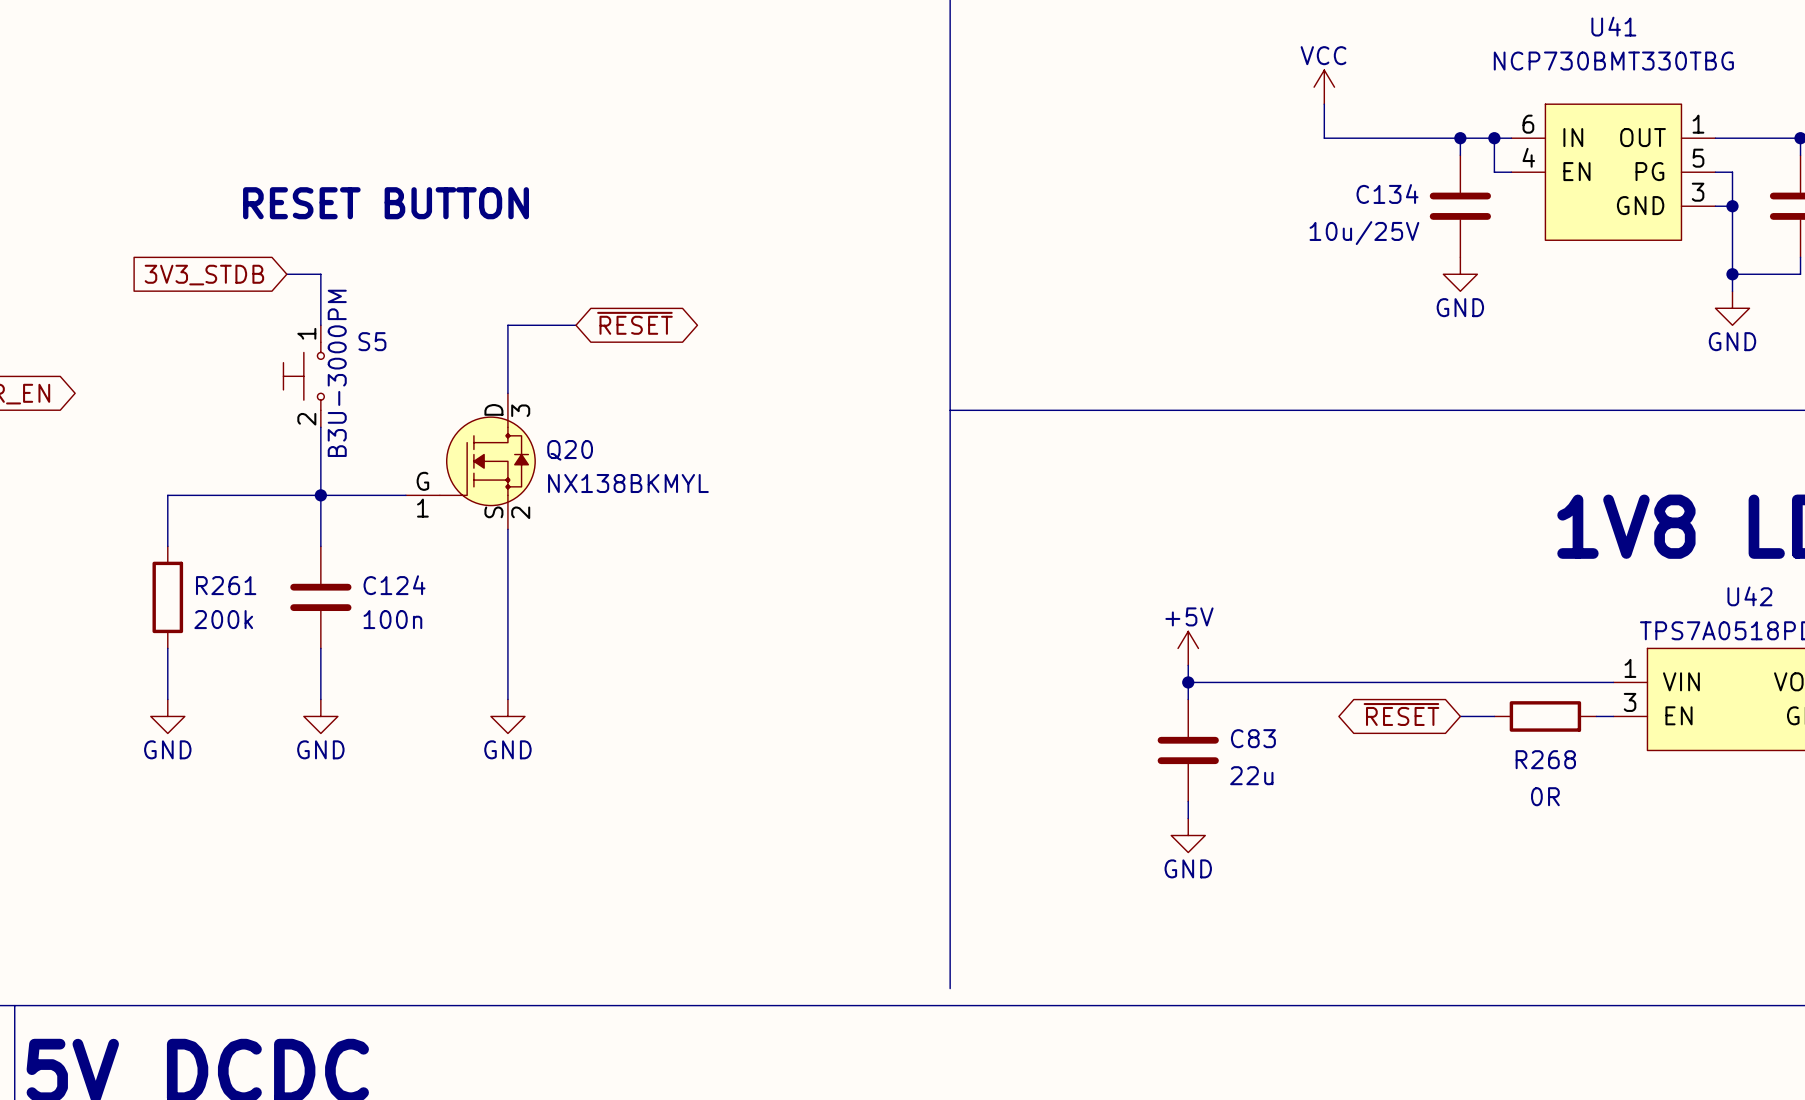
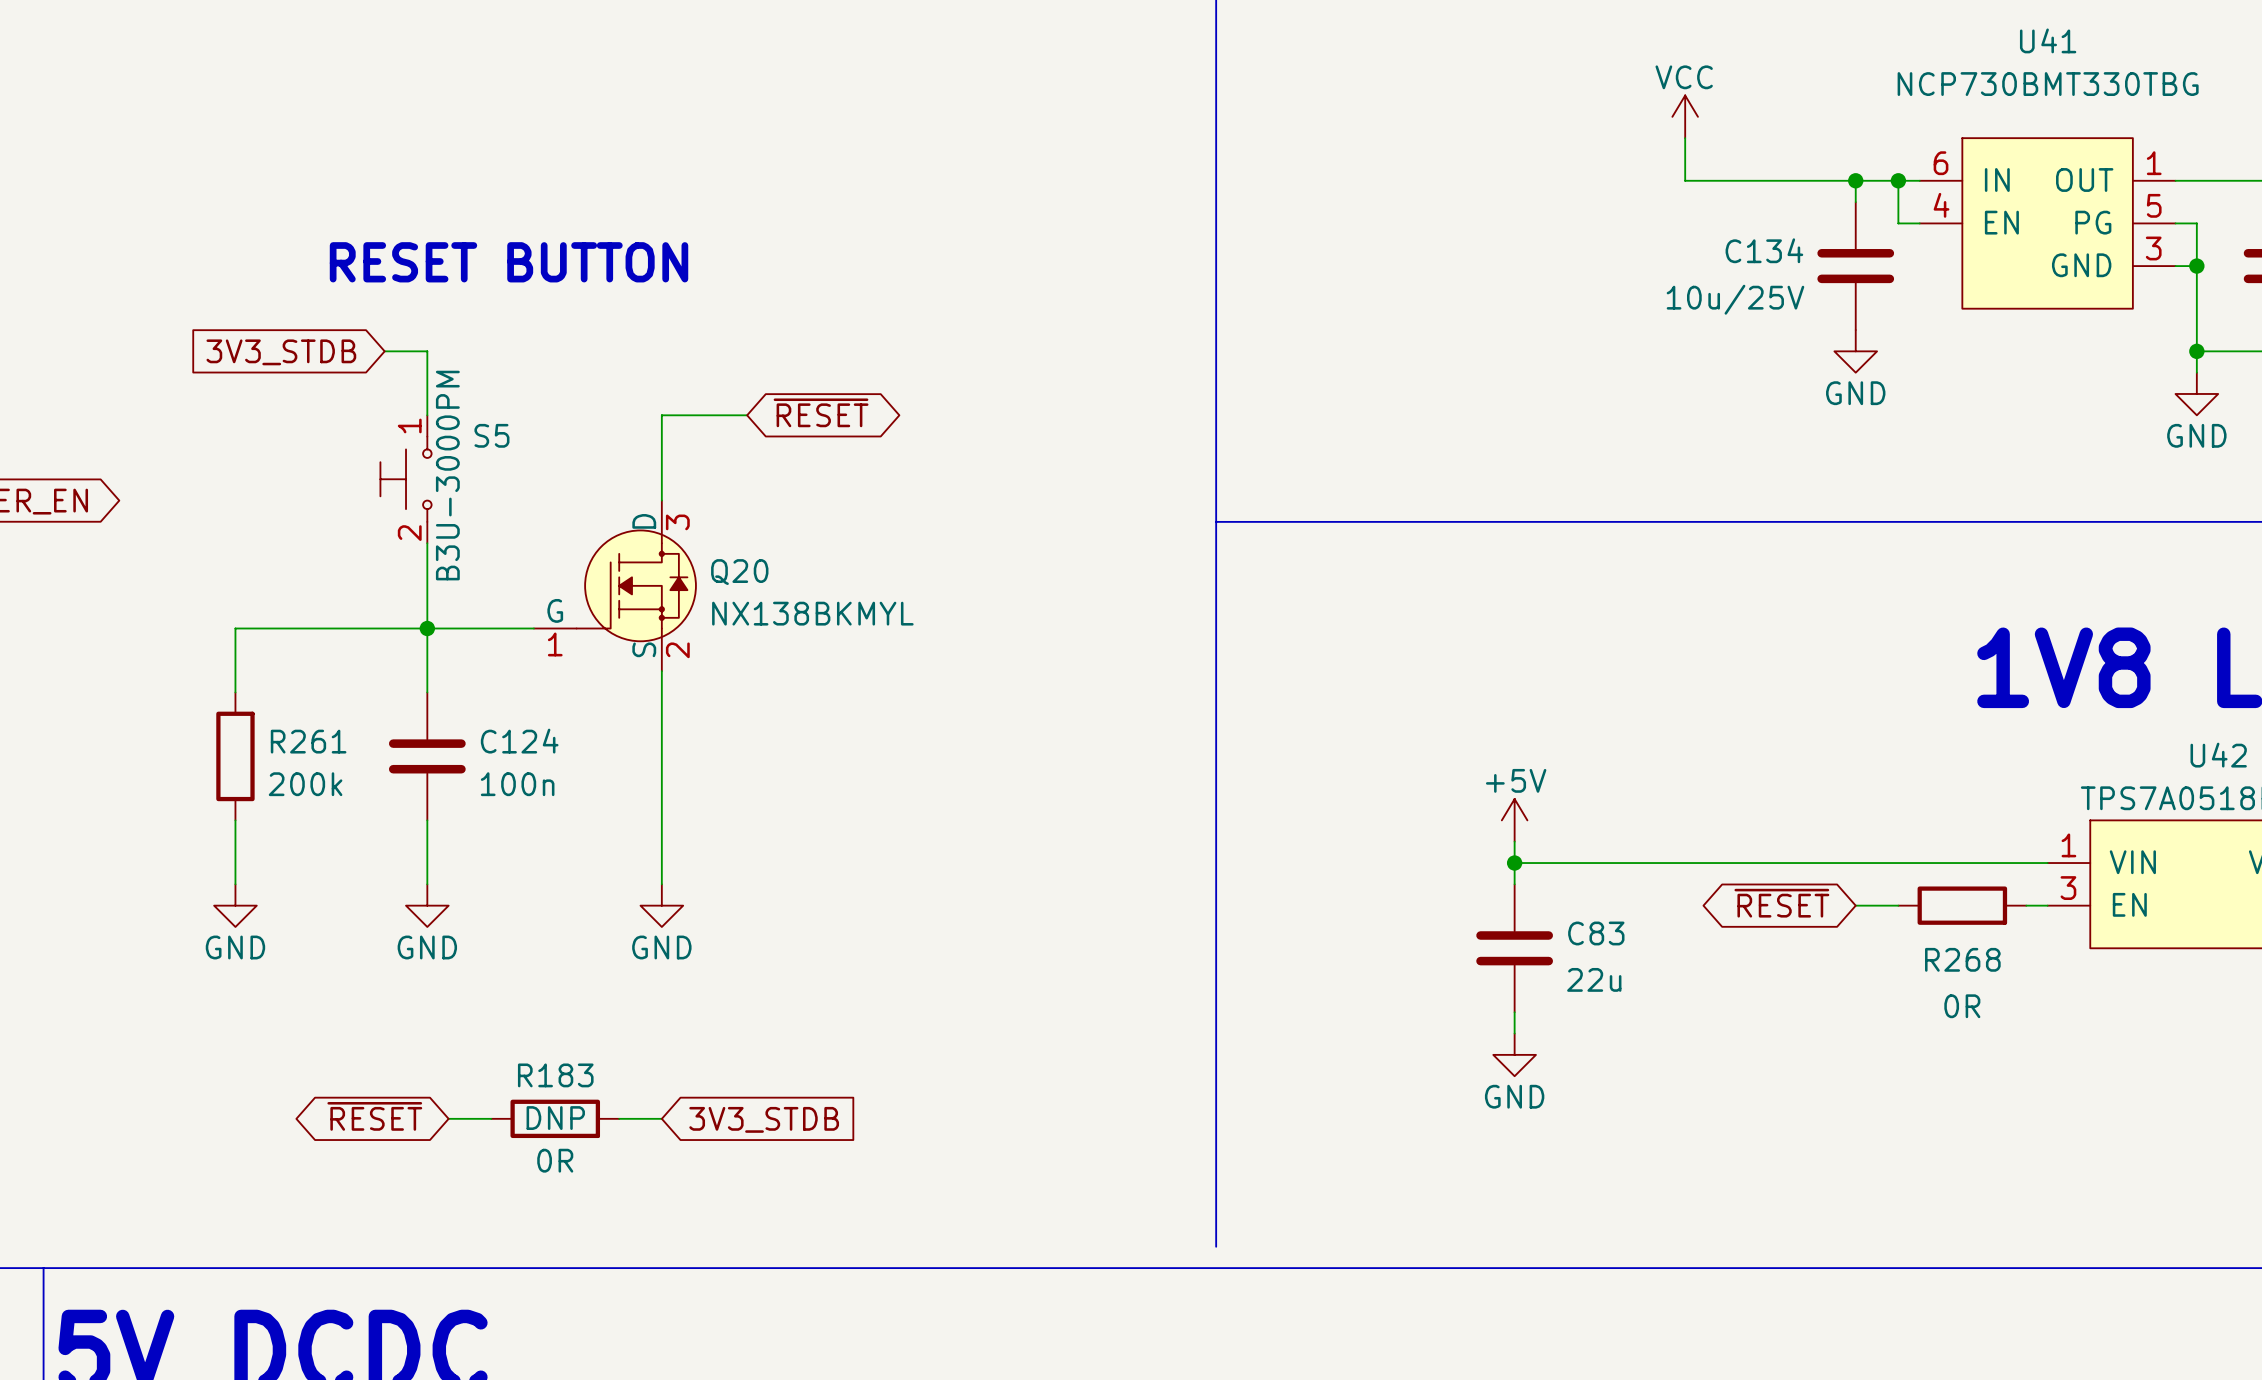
global label: none -> ~{RESET} (374, 1116)
wire: none -> (448, 1118) (491, 1118)
R183: none -> (555, 1118)
wire: none -> (619, 1118) (661, 1118)
global label: none -> 3V3_STDB (764, 1119)

